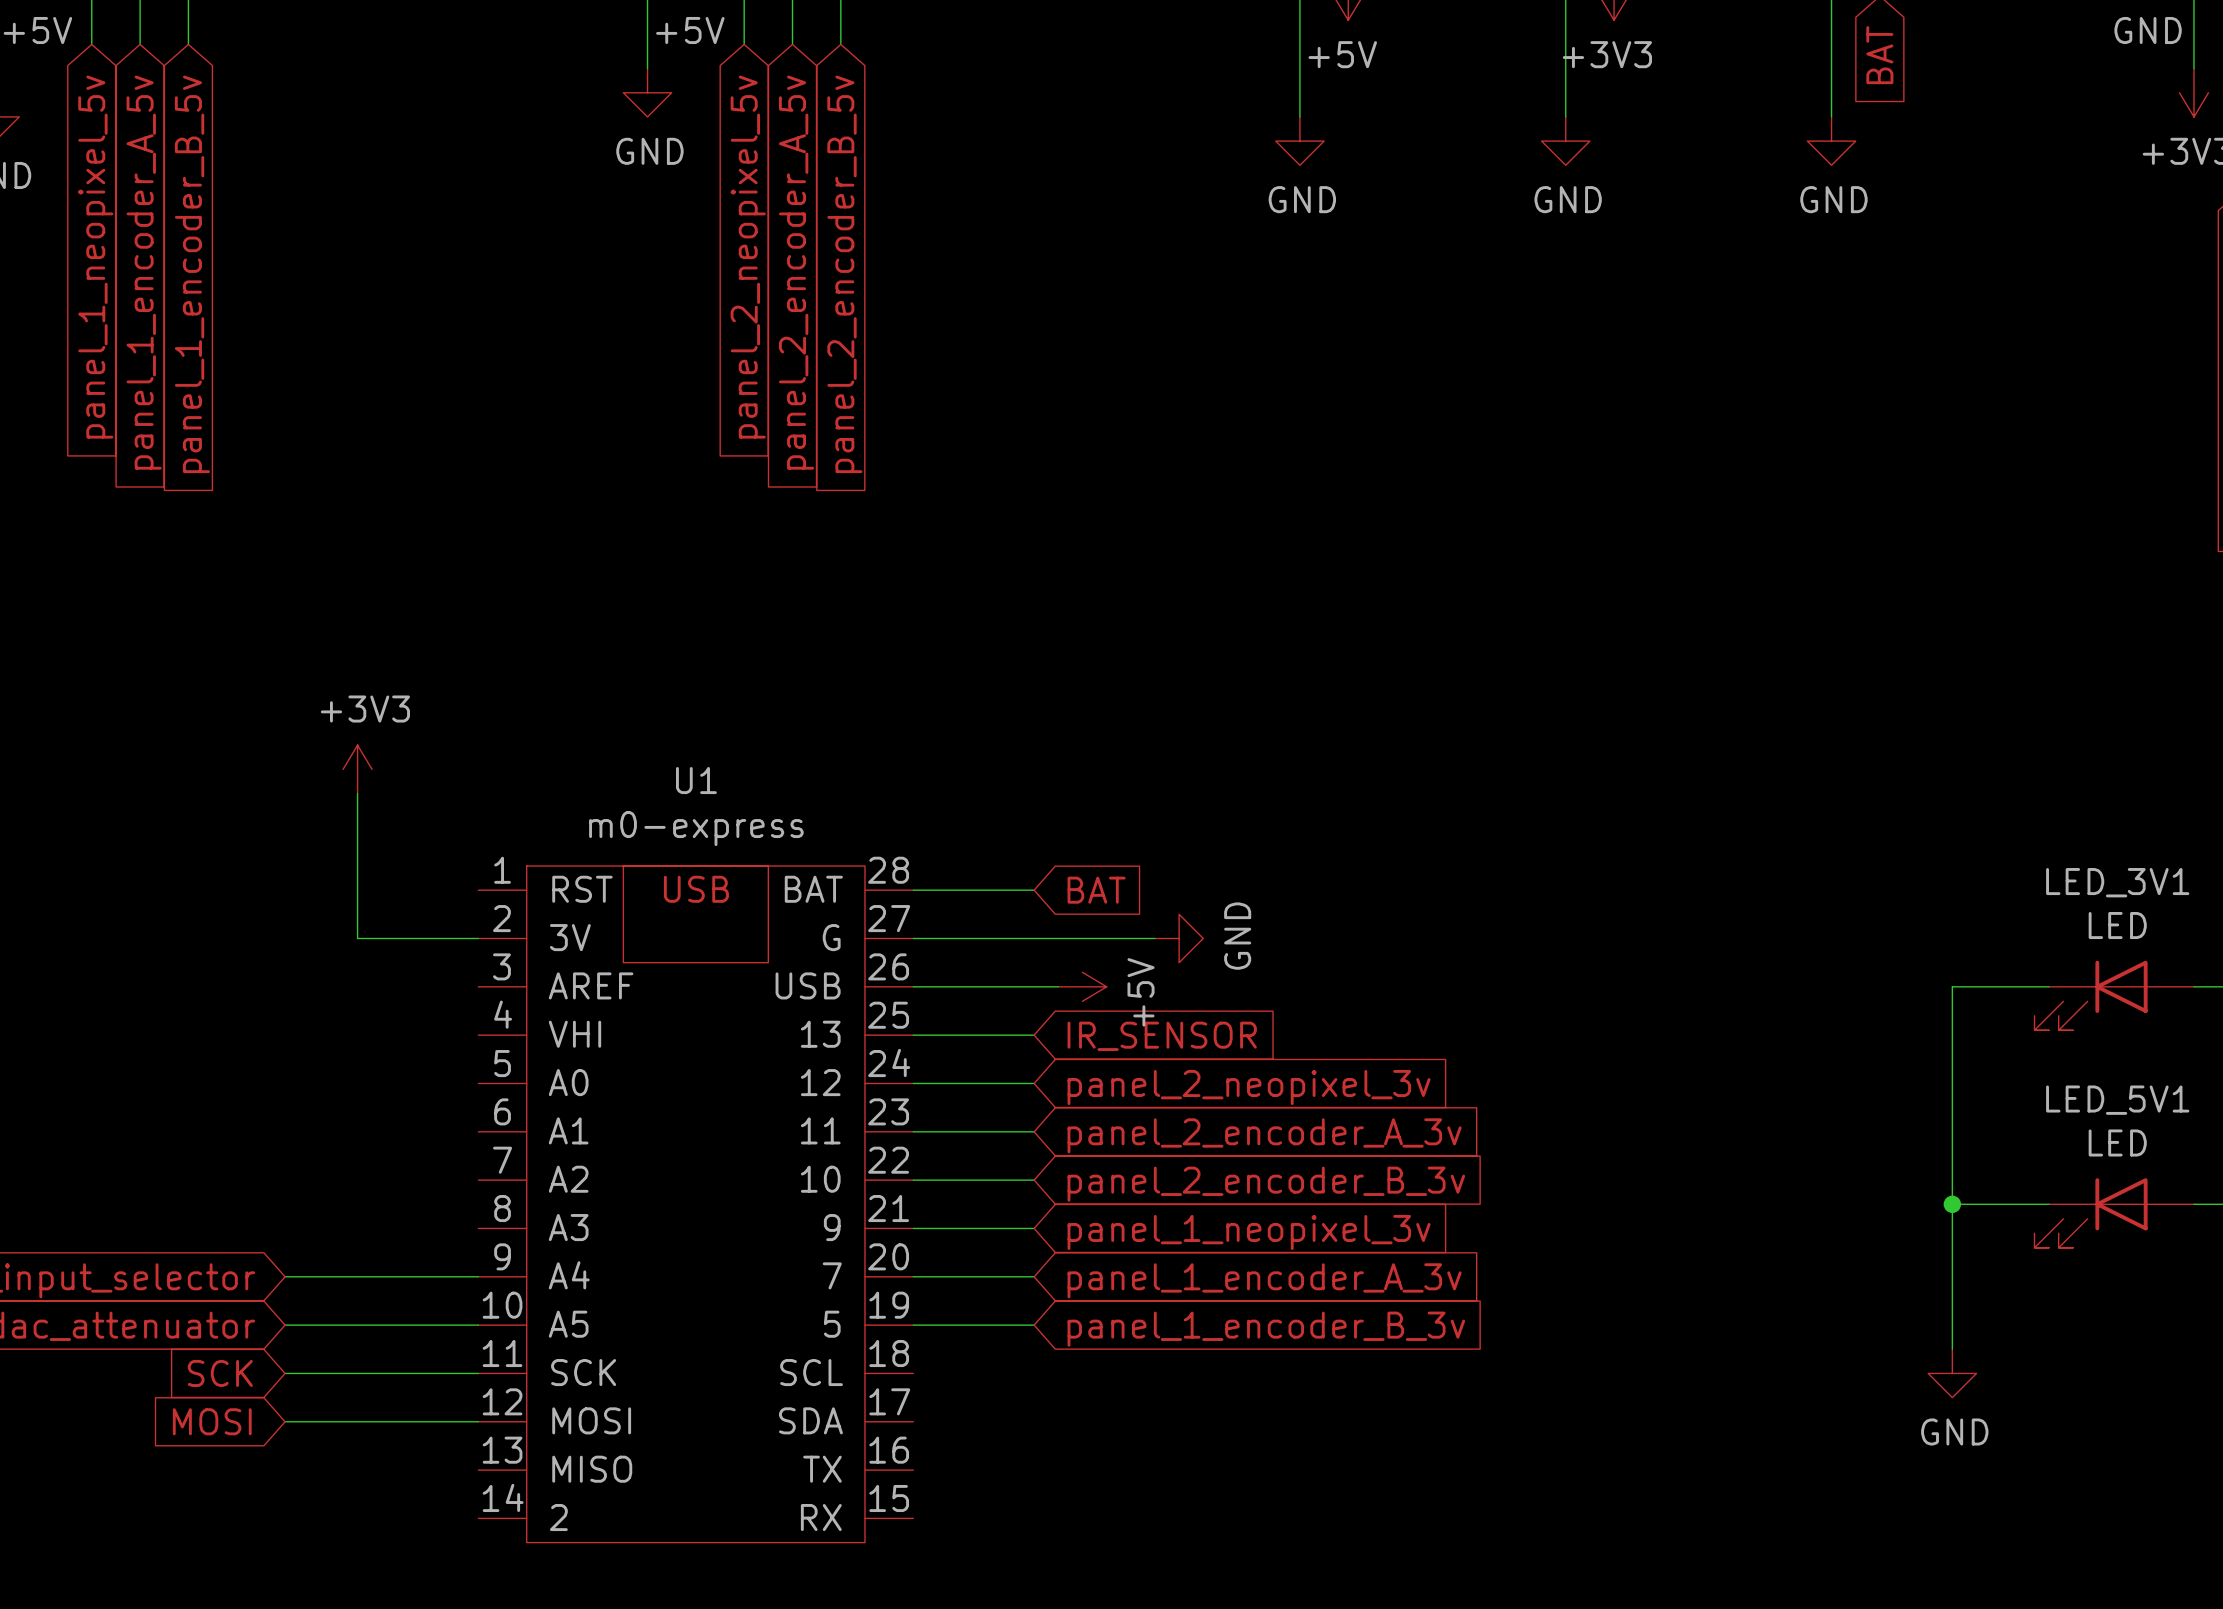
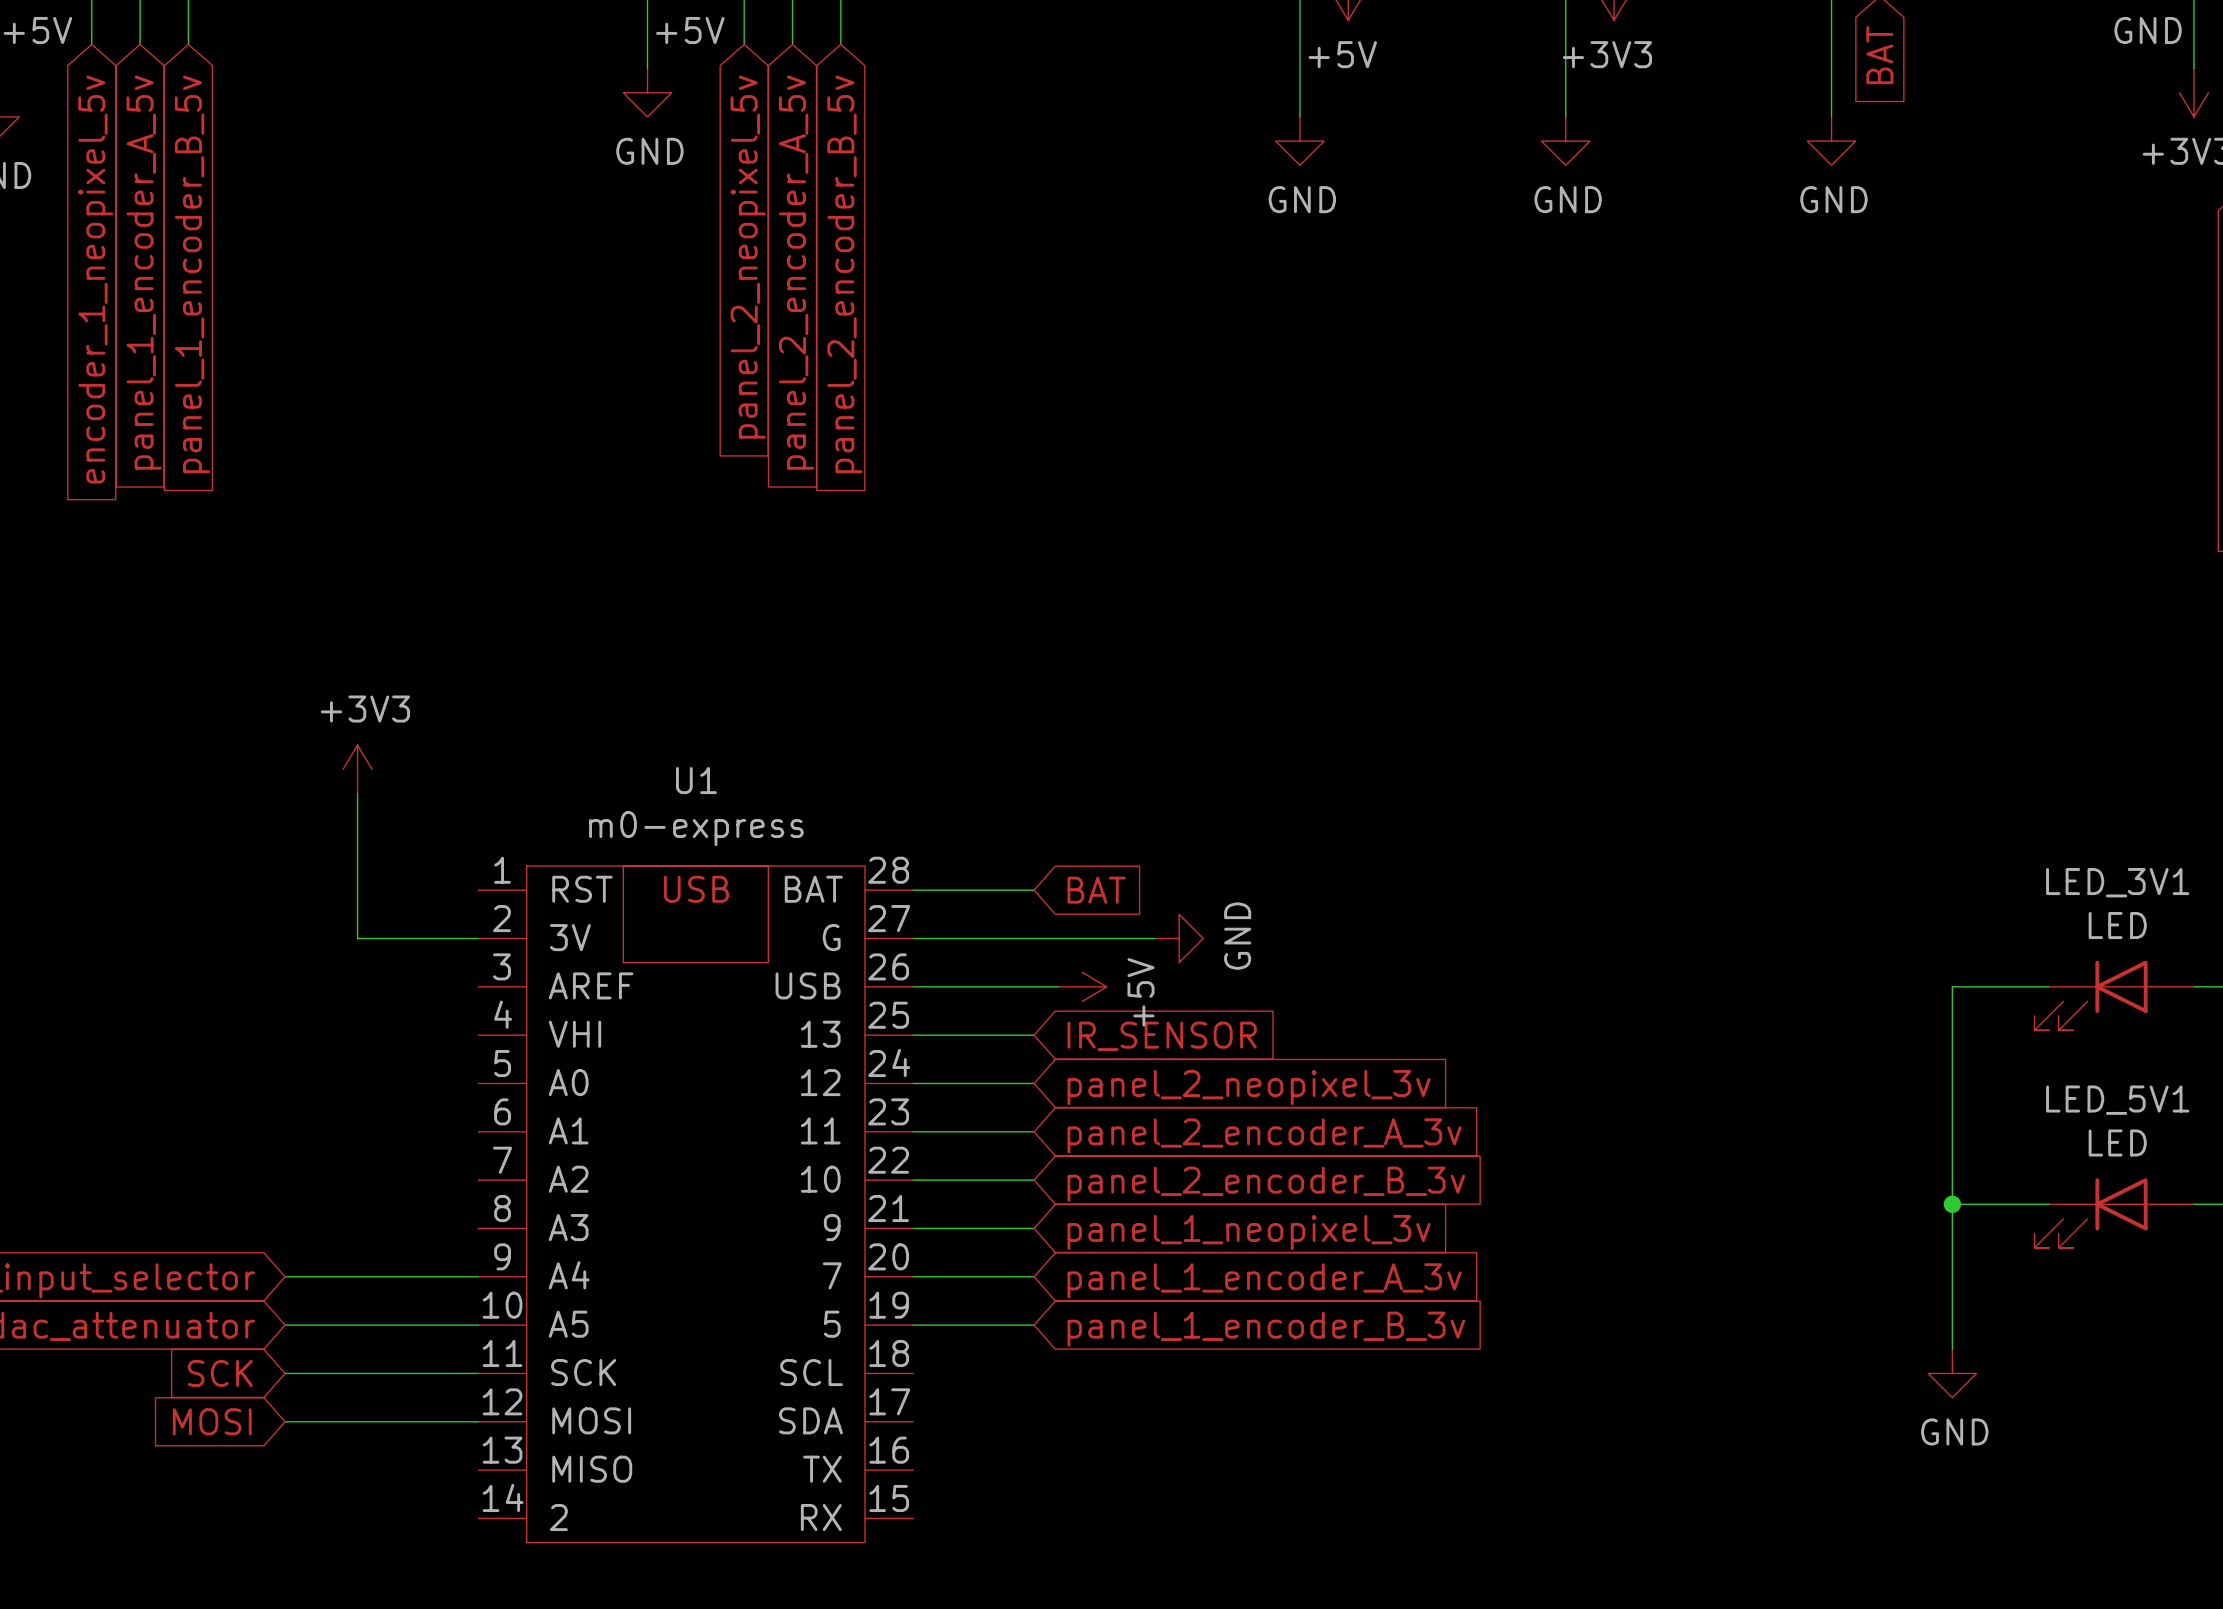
global label: panel_1_neopixel_5v (95, 257) -> encoder_1_neopixel_5v (95, 279)

